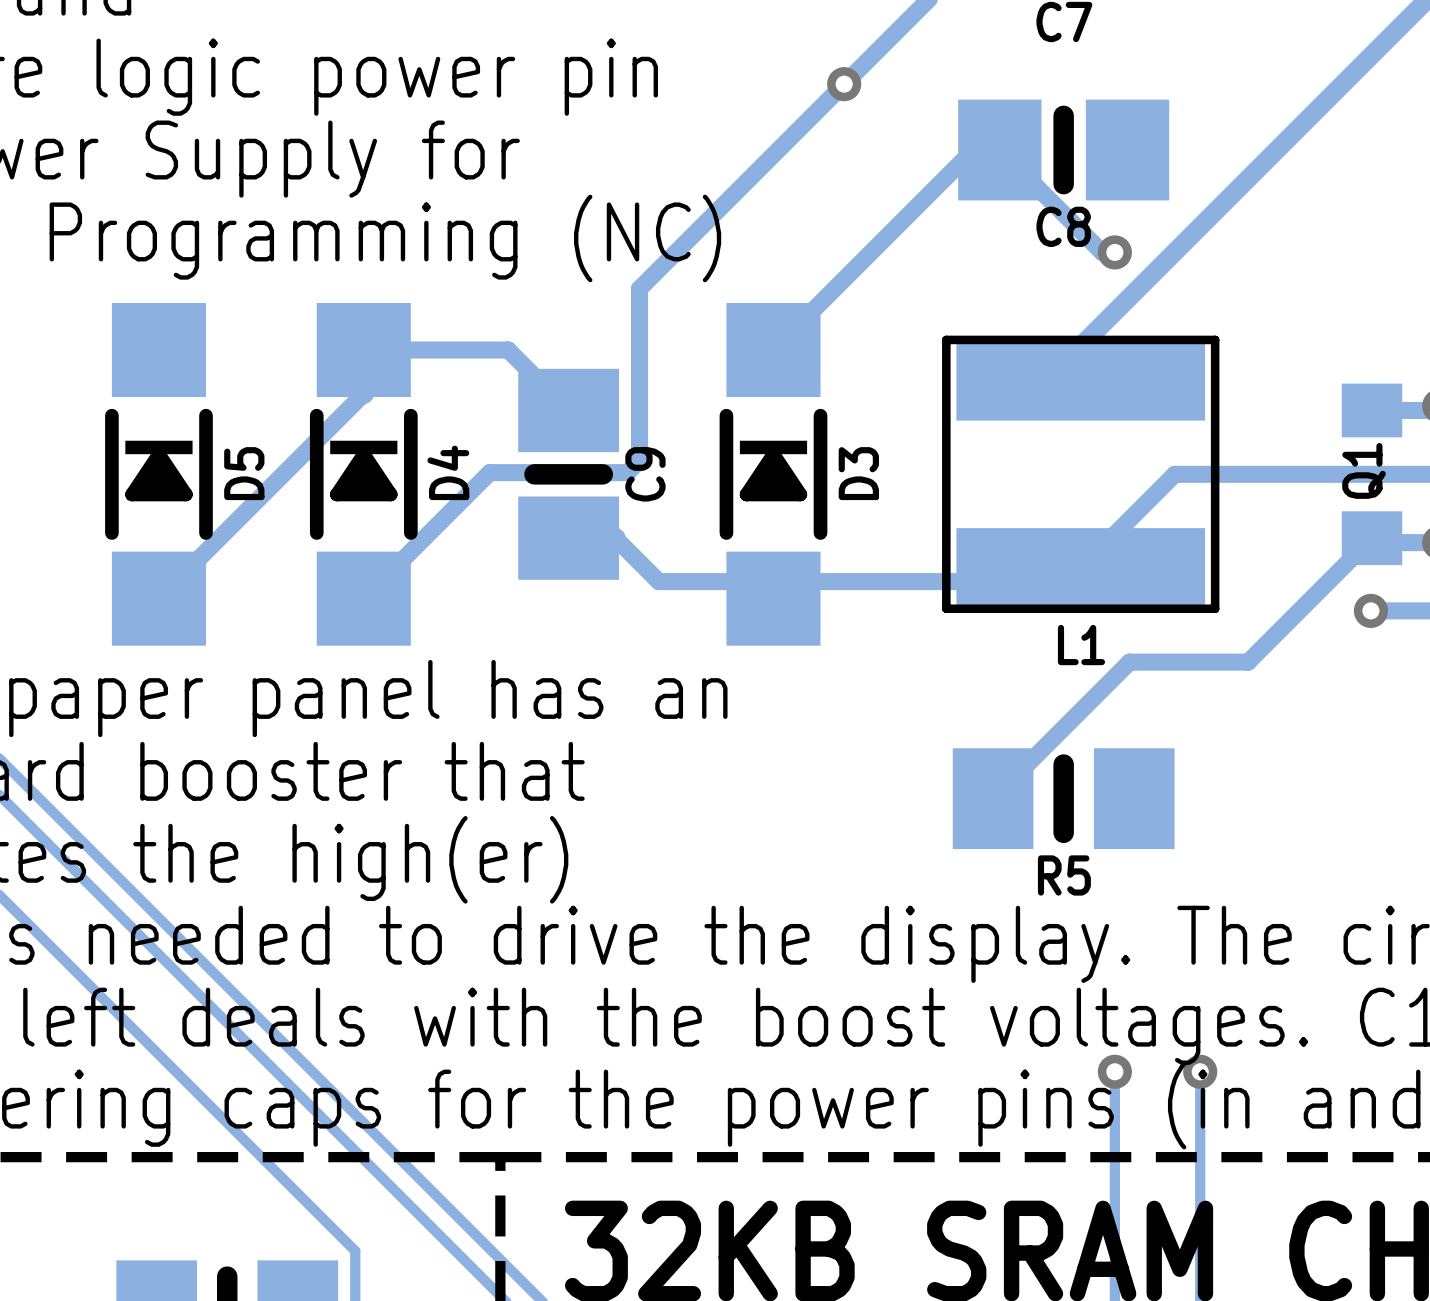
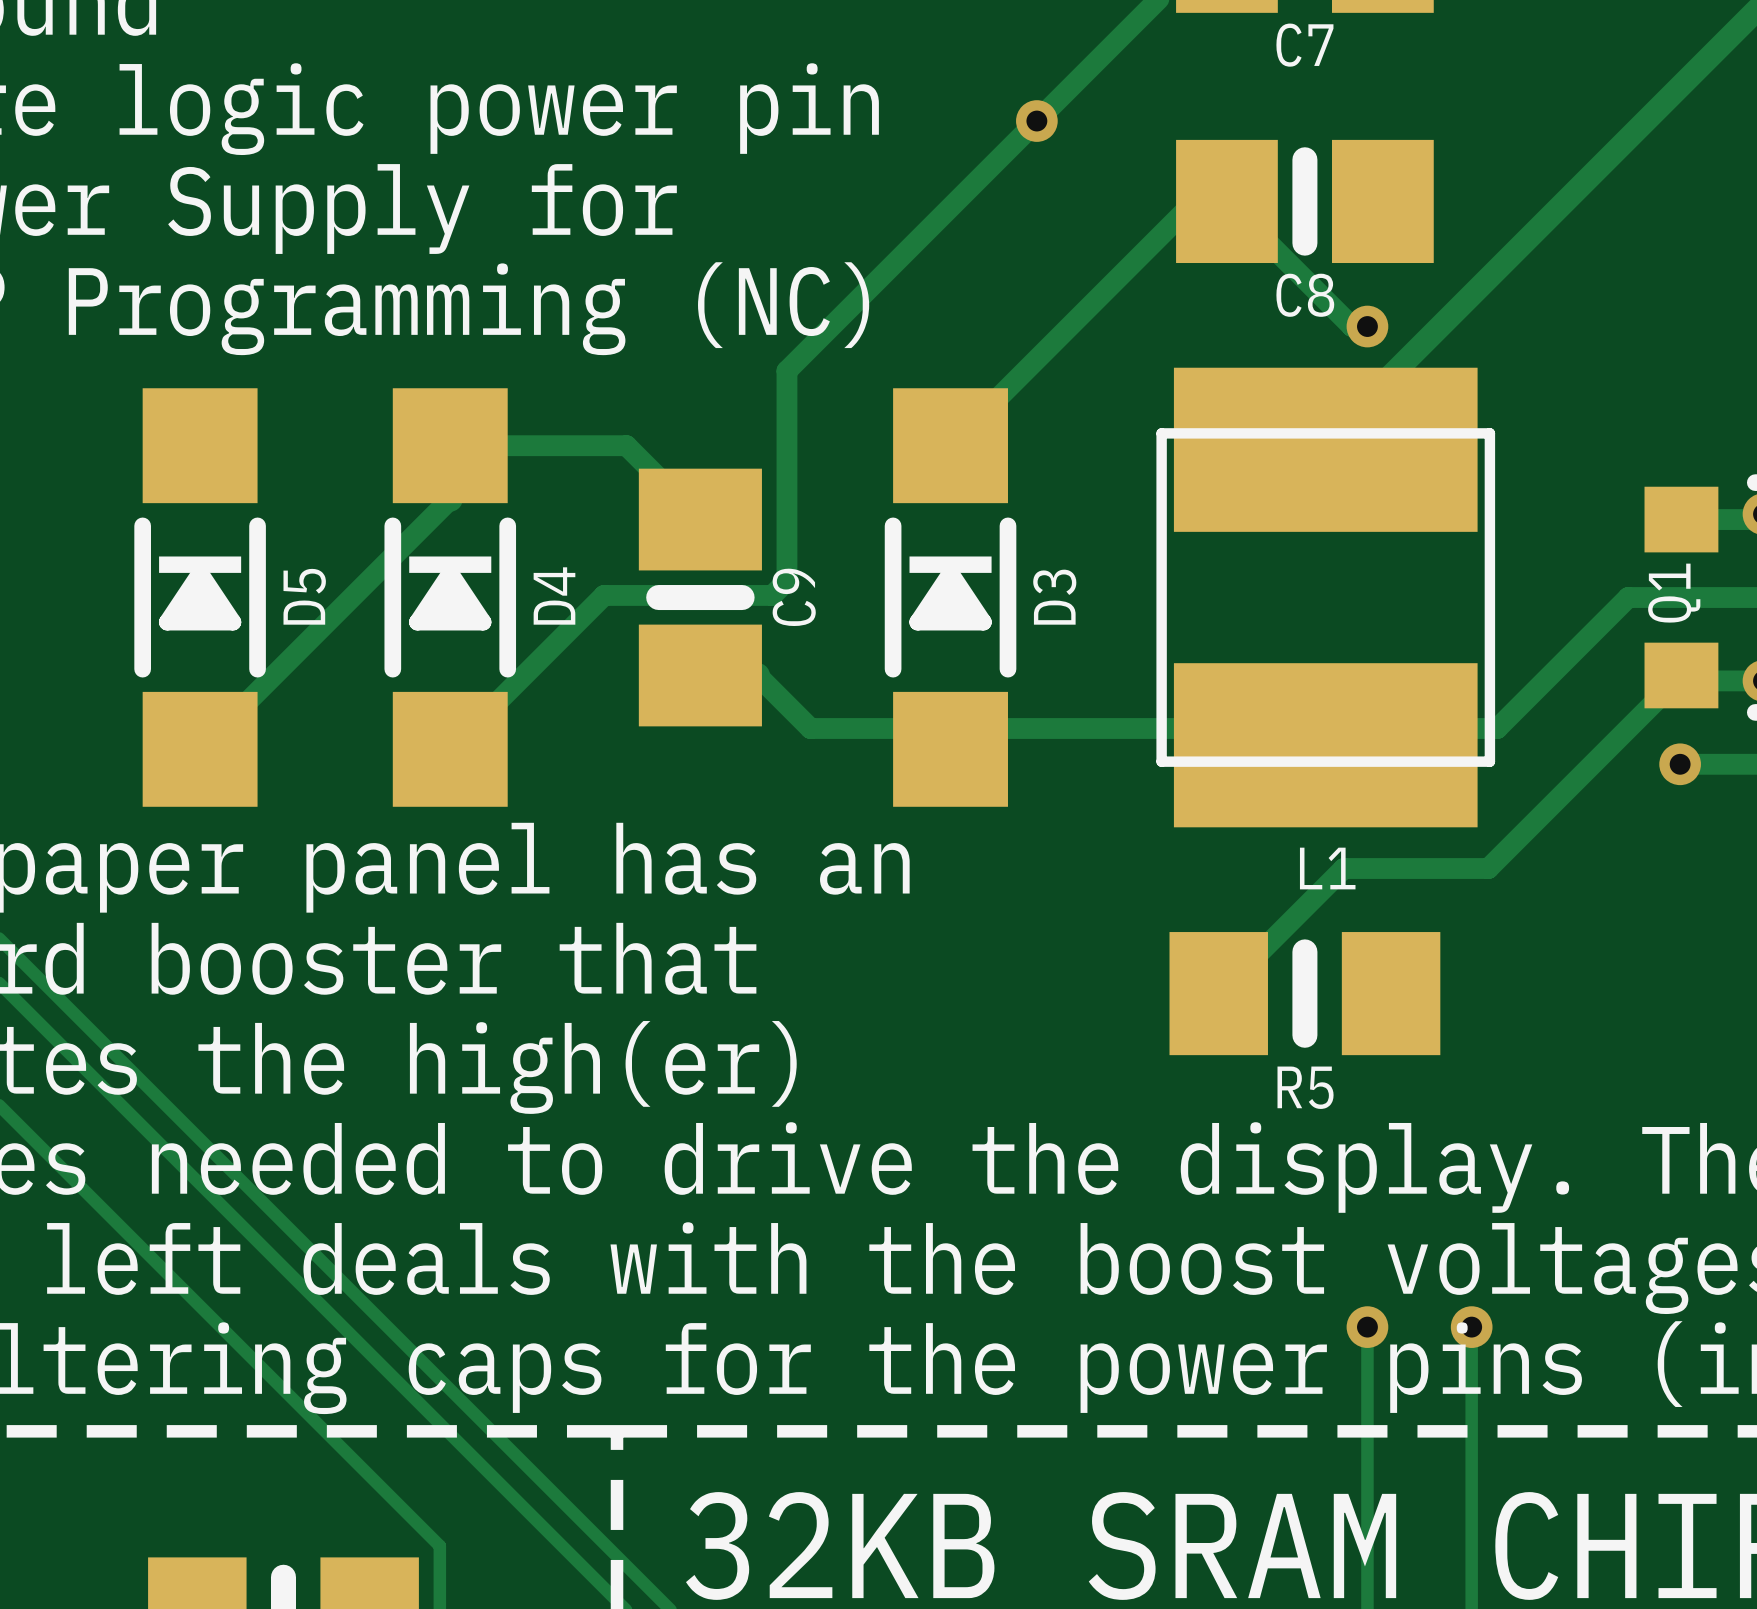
L1 footprint: [942, 335, 1220, 614] -> [1156, 367, 1496, 828]
track: (1328, 474) (1174, 474) (1067, 581) -> (1628, 597) (1497, 728) (1309, 728) (1325, 744)
L1 name position: L1 (1081, 645) -> L1 (1327, 868)
track: (1248, 662) (1129, 662) (1095, 696) -> (1530, 826) (1488, 868) (1343, 868)

